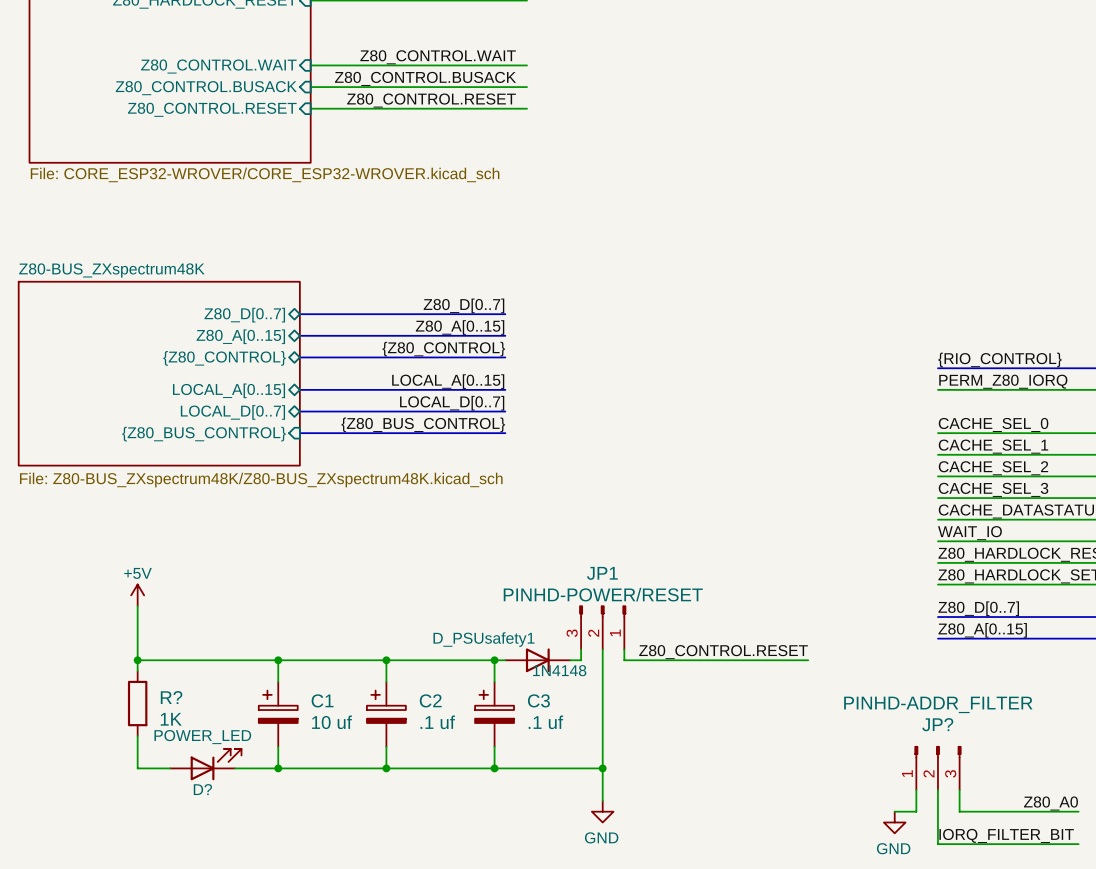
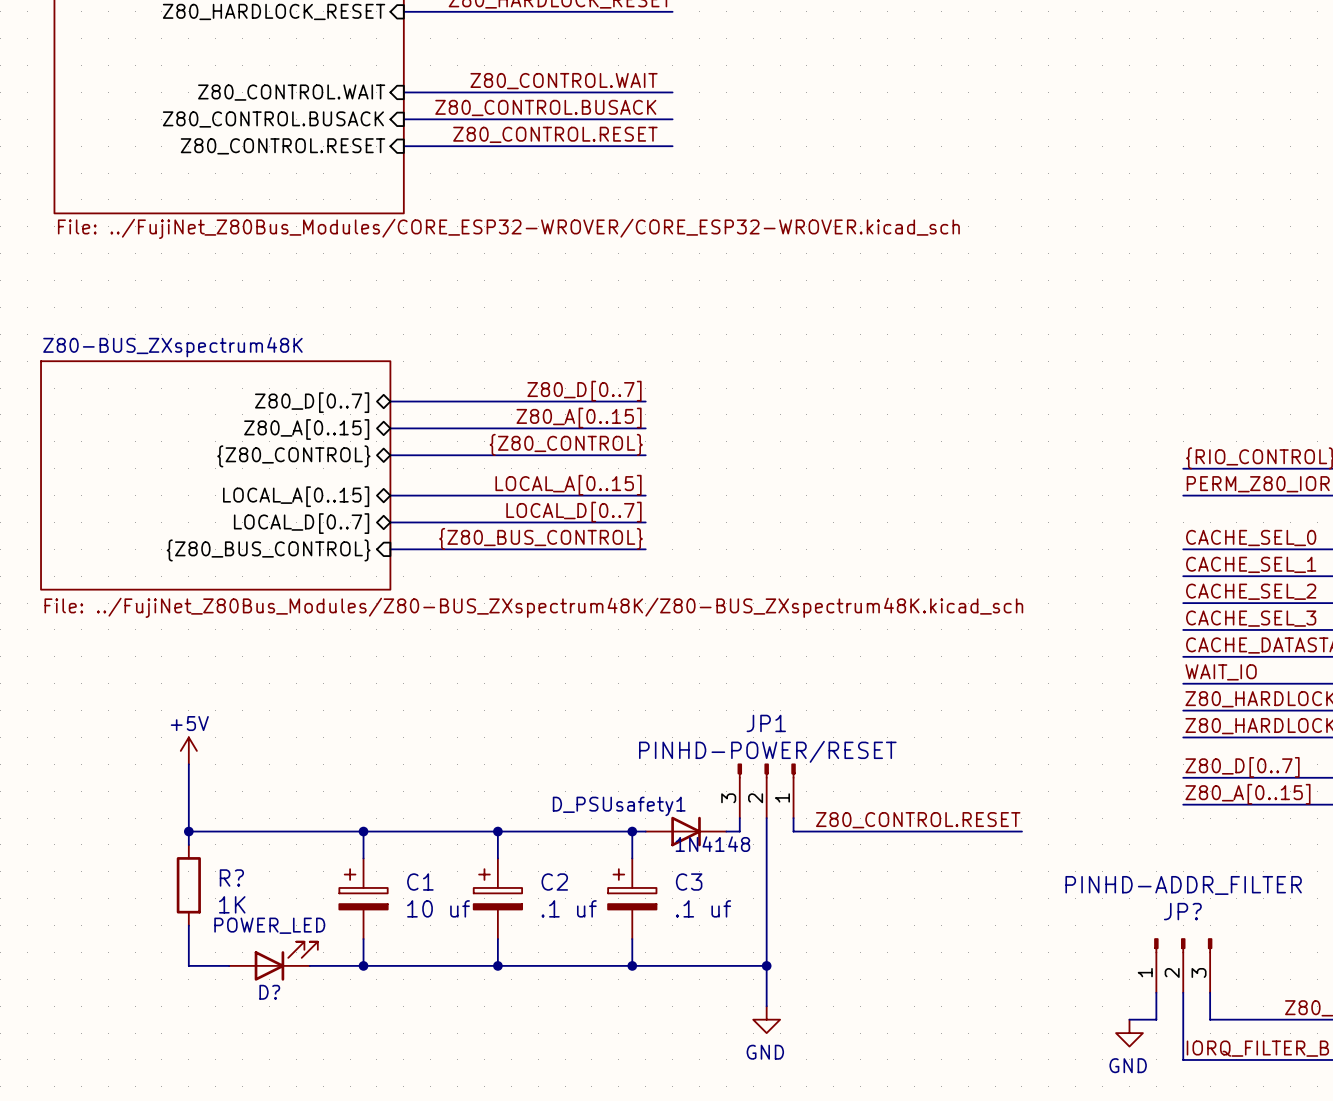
sheet value: File: CORE_ESP32-WROVER/CORE_ESP32-WROVER.kicad_sch (265, 174) -> File: ../FujiNet_Z80Bus_Modules/CORE_ESP32-WROVER/CORE_ESP32-WROVER.kicad_sch (508, 228)
sheet Z80-BUS_ZXspectrum48K value: File: Z80-BUS_ZXspectrum48K/Z80-BUS_ZXspectrum48K.kicad_sch (261, 480) -> File: ../FujiNet_Z80Bus_Modules/Z80-BUS_ZXspectrum48K/Z80-BUS_ZXspectrum48K.kicad_sch (533, 607)

